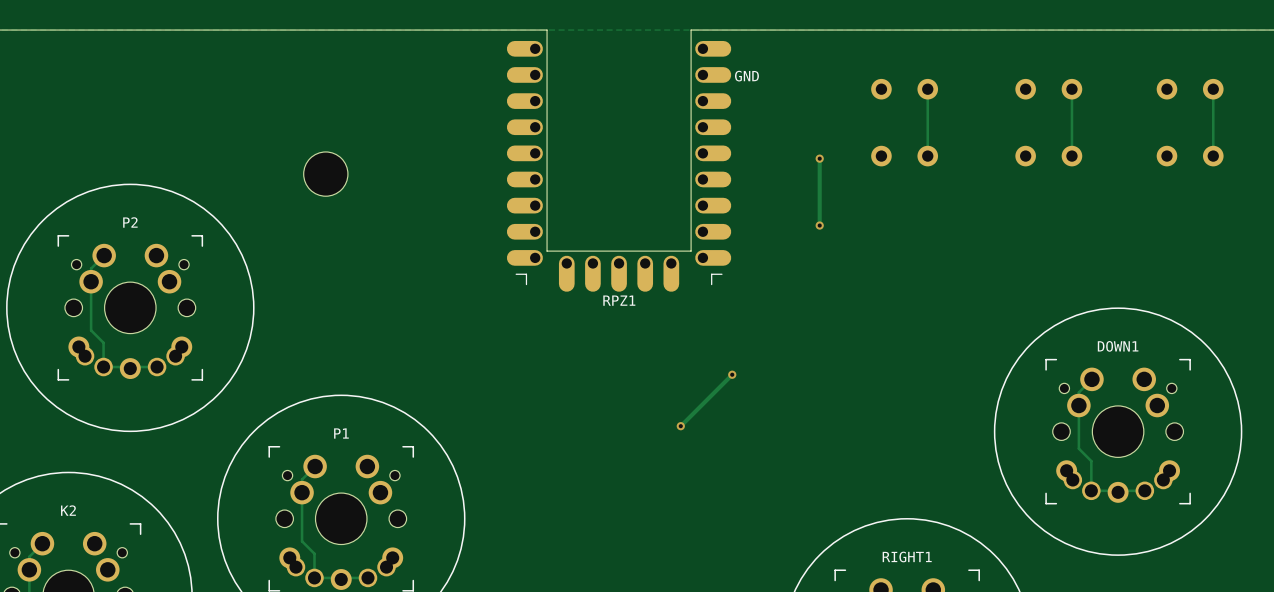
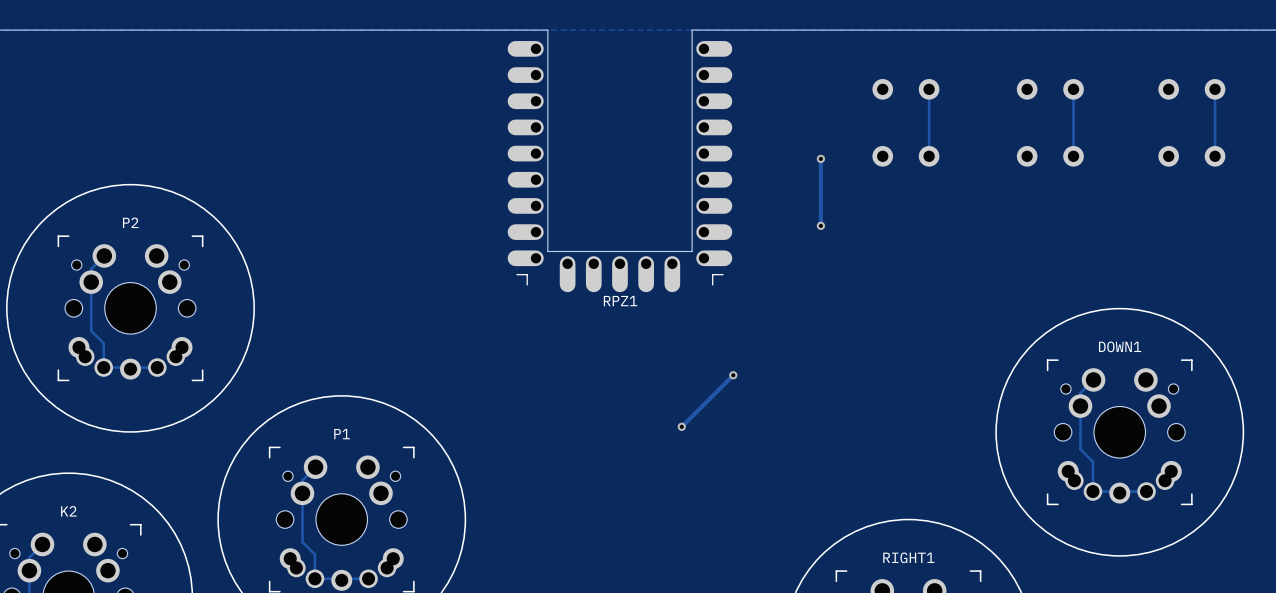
text: GND (746, 76) -> none
part: (325, 174) -> none

